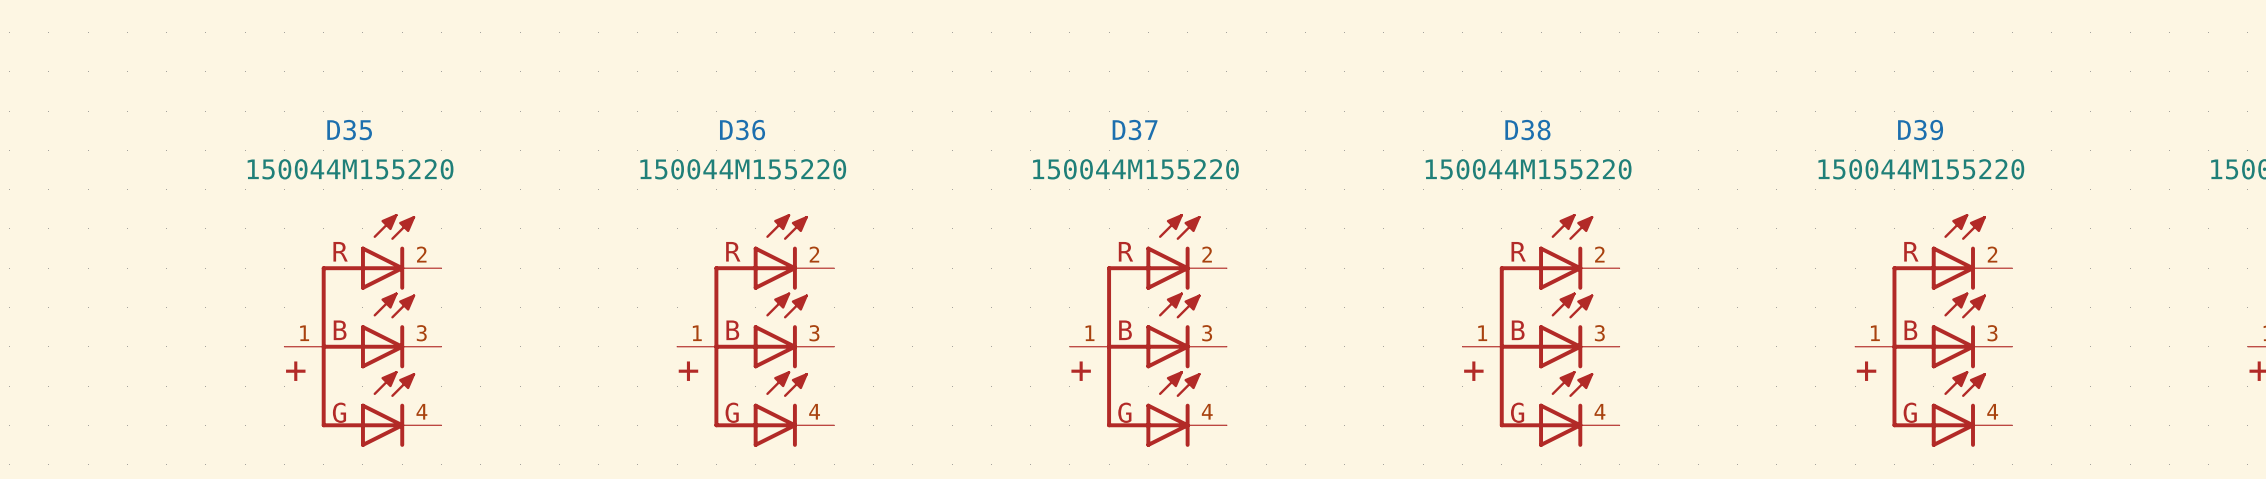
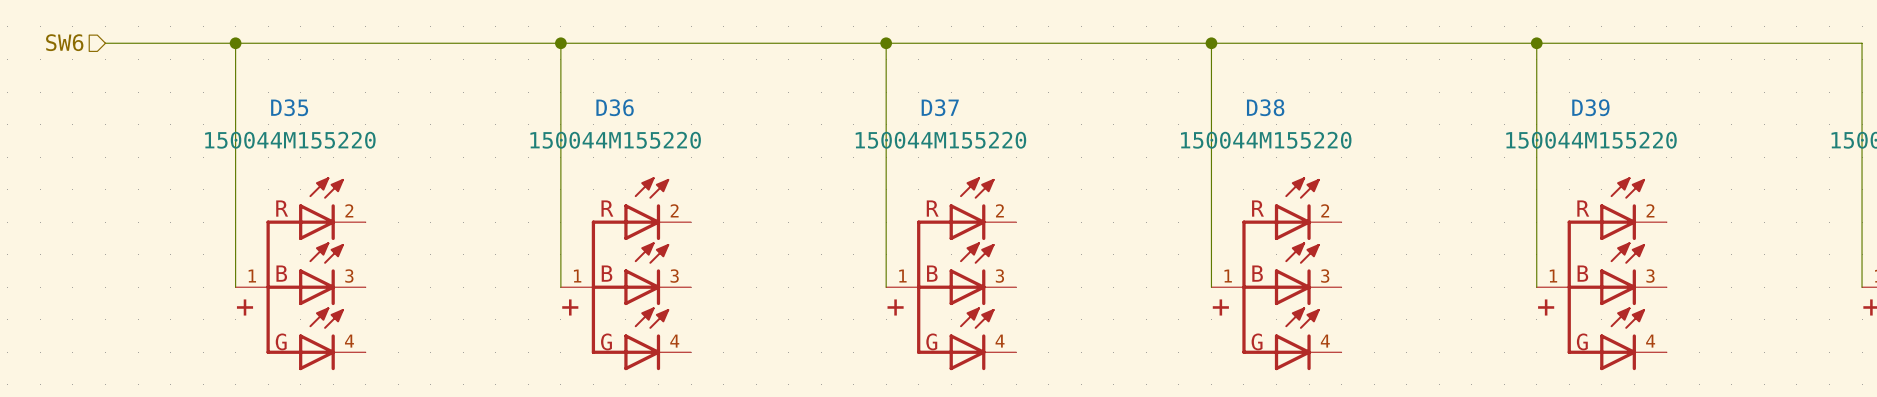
hierarchical label: none -> SW6 (64, 42)
wire: none -> (105, 43) (1862, 43) (1862, 287)
wire: none -> (235, 43) (235, 287)
junction: none -> (235, 43)
wire: none -> (560, 43) (560, 287)
junction: none -> (560, 43)
wire: none -> (886, 43) (886, 287)
junction: none -> (886, 43)
wire: none -> (1211, 43) (1211, 287)
junction: none -> (1211, 43)
wire: none -> (1536, 43) (1536, 287)
junction: none -> (1536, 43)

